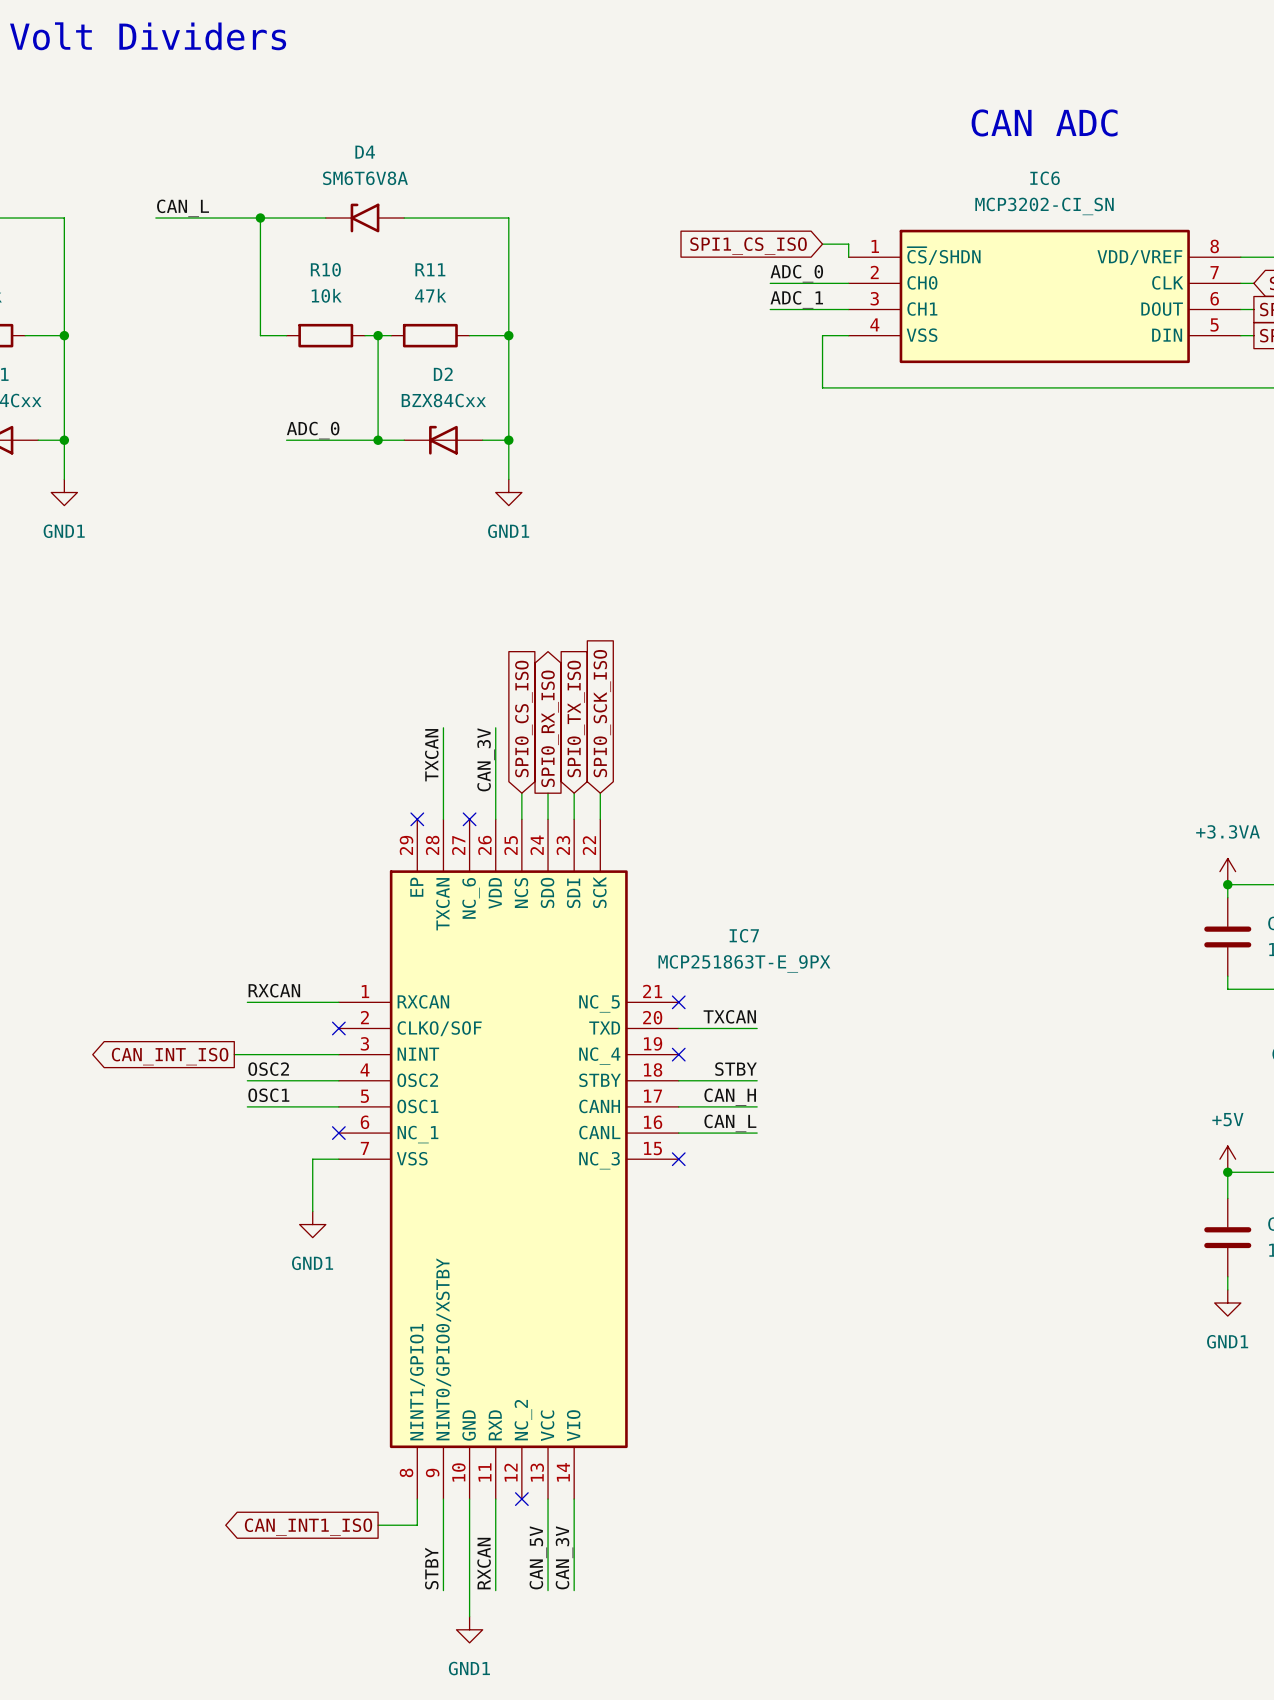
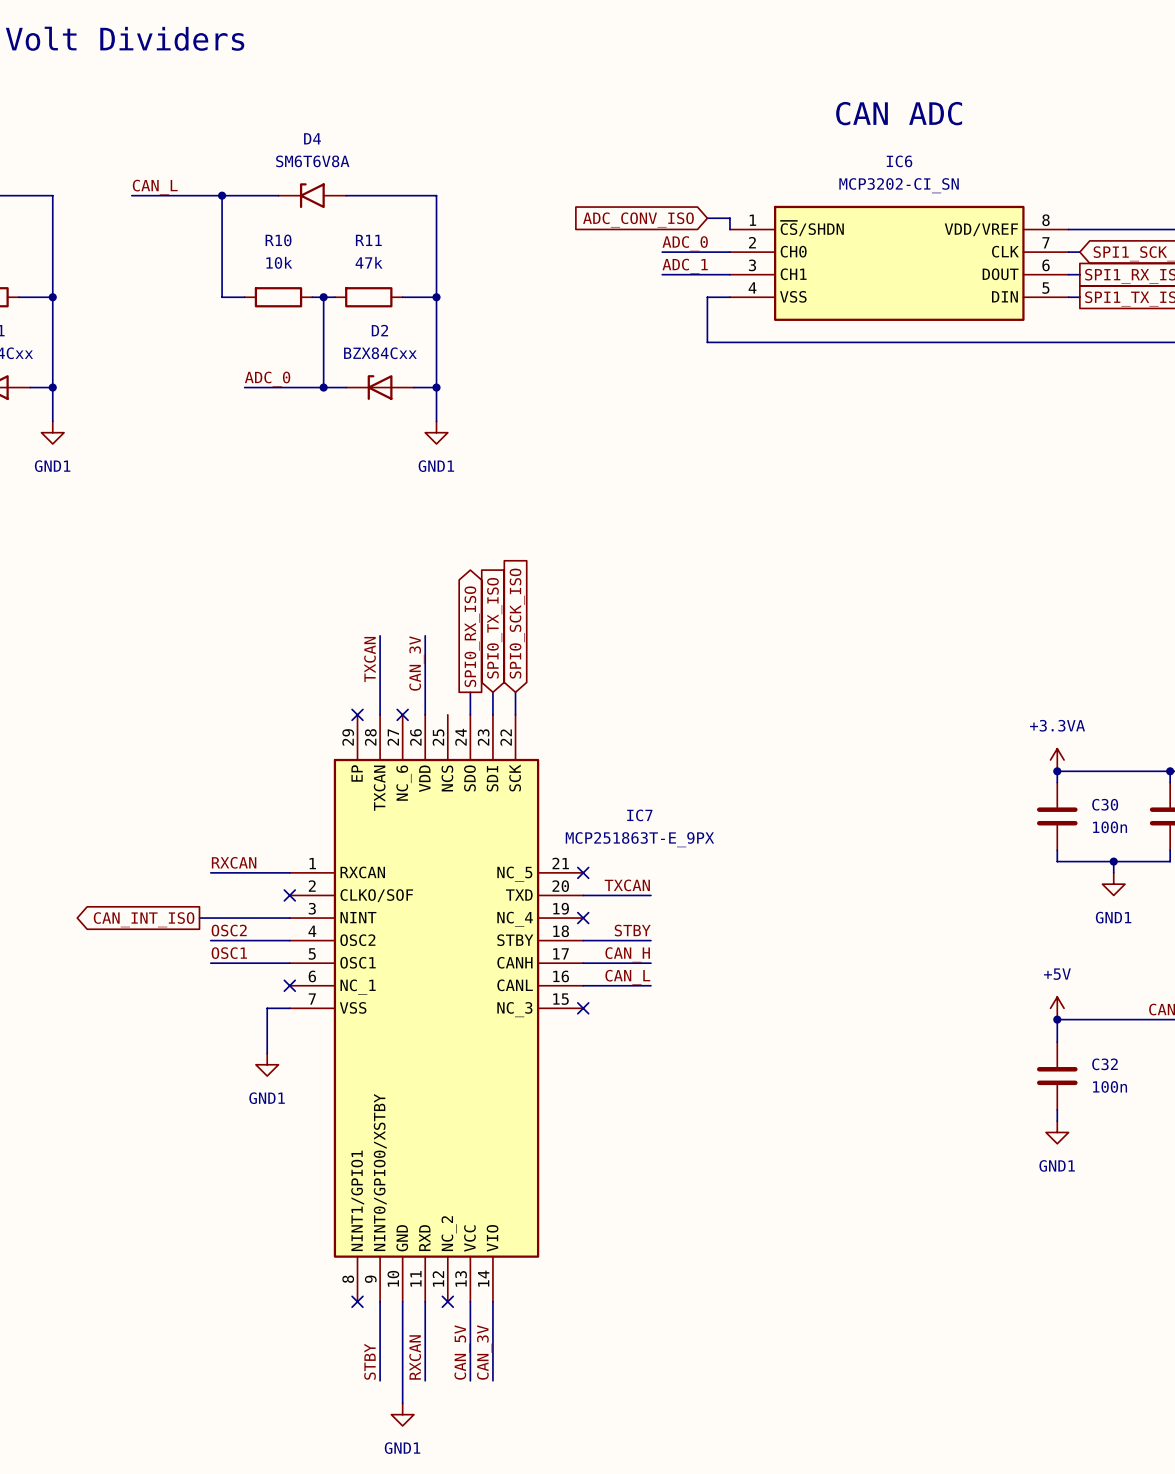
global label: SPI1_CS_ISO (748, 246) -> ADC_CONV_ISO (638, 219)
global label: SPI0_CS_ISO (523, 719) -> none
wire: (521, 793) (521, 819) -> none
wire: (417, 1499) (417, 1525) (378, 1525) -> none
no-connect mark: none -> (357, 1301)
global label: CAN_INT1_ISO (308, 1527) -> none

